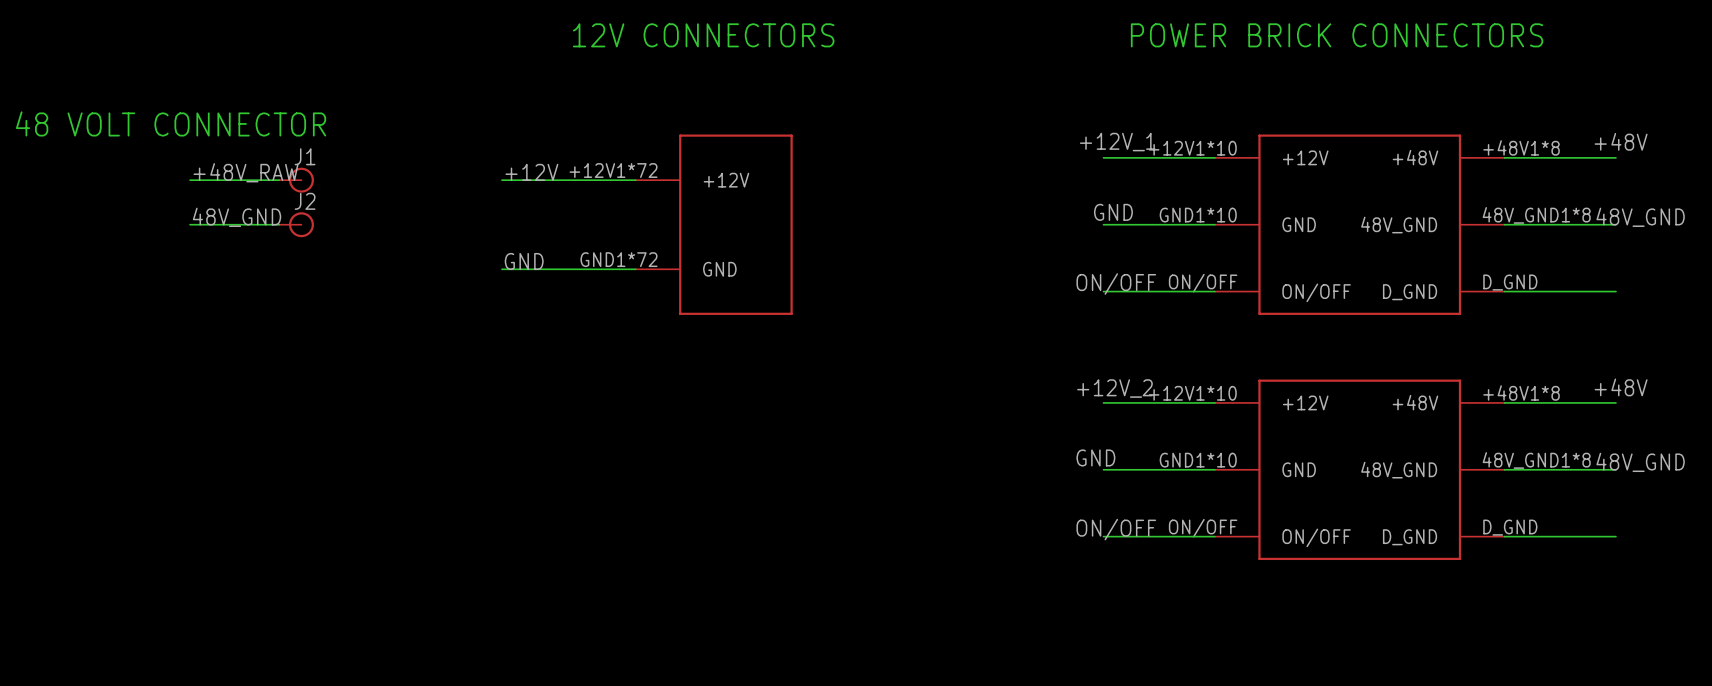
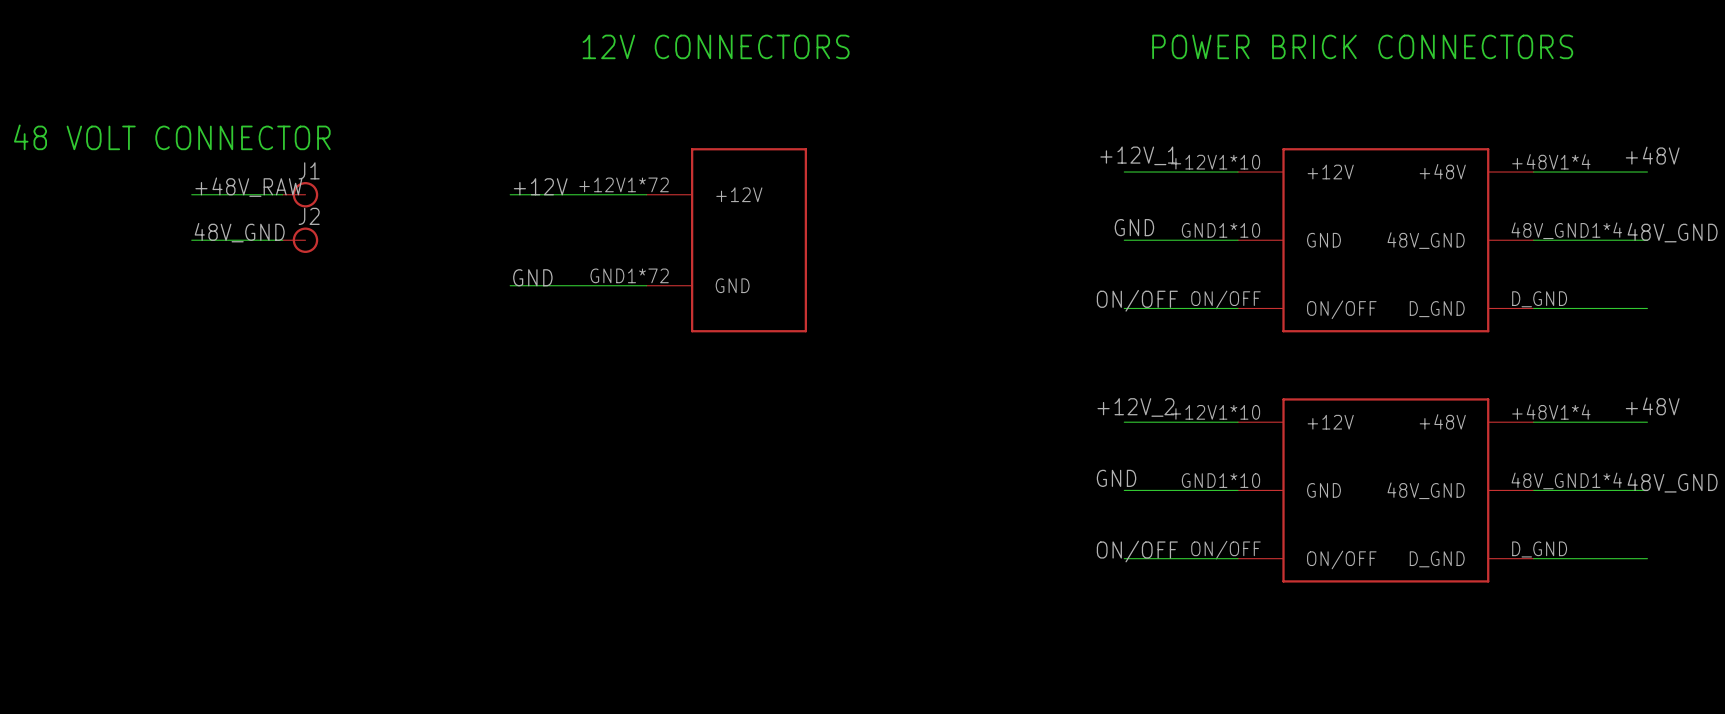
part pin number: +48V1*8 (1521, 147) -> +48V1*4 (1551, 161)
part pin number: 48V_GND1*8 (1536, 215) -> 48V_GND1*4 (1566, 230)
part pin number: +48V1*8 (1521, 392) -> +48V1*4 (1551, 412)
part pin number: 48V_GND1*8 (1536, 460) -> 48V_GND1*4 (1566, 480)

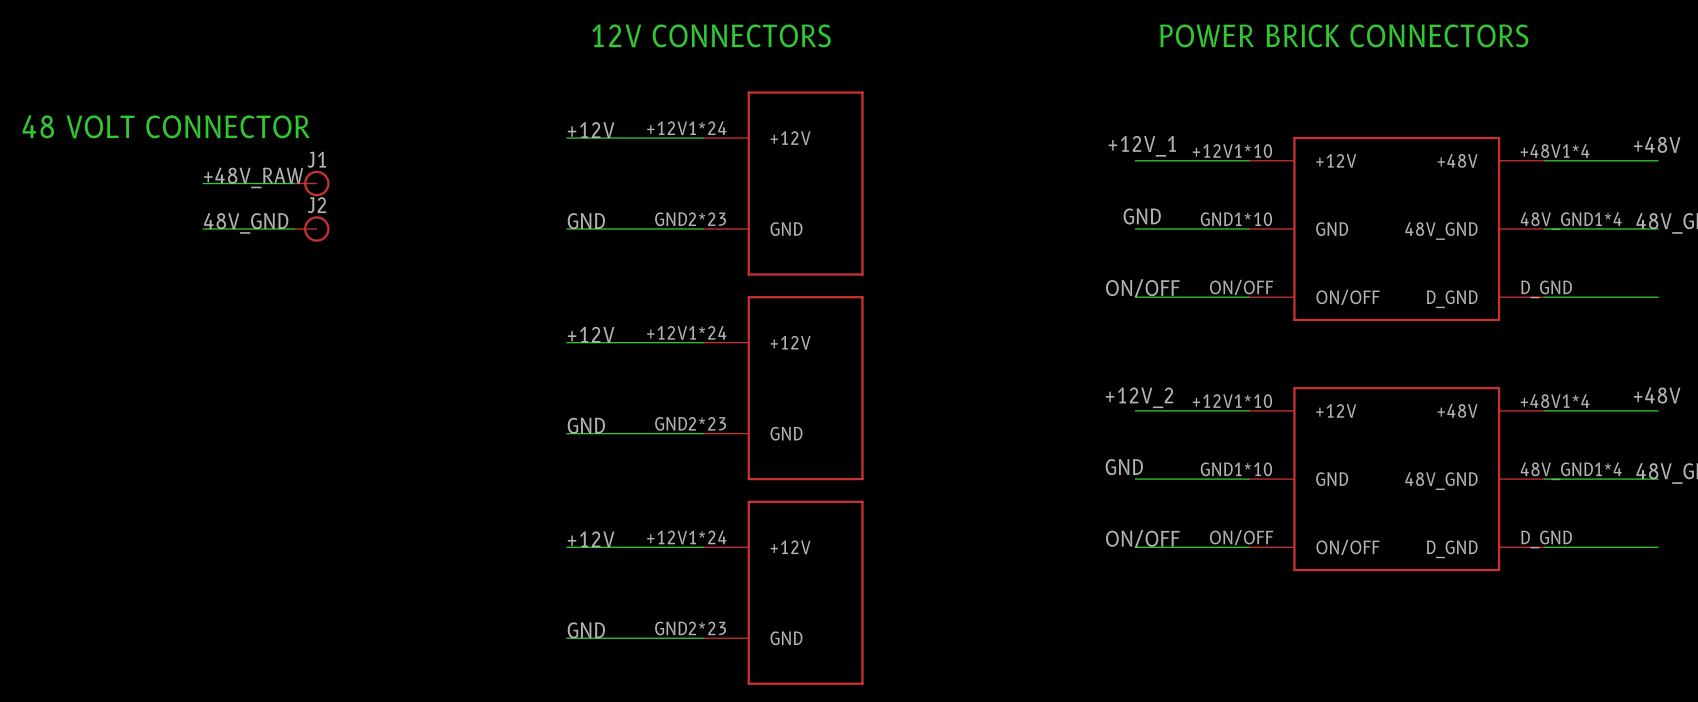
label position: +12V (540, 186) -> +12V (591, 130)
wire: (510, 194) (646, 194) -> (566, 138) (703, 138)
part: none -> (783, 183)
part: (726, 240) -> none
label position: GND (532, 277) -> GND (586, 221)
wire: (510, 285) (646, 285) -> (566, 229) (703, 229)
label: none -> +12V (591, 334)
wire: none -> (566, 342) (703, 342)
part: none -> (783, 388)
label: none -> GND (586, 425)
wire: none -> (566, 433) (703, 433)
label: none -> +12V (591, 539)
wire: none -> (566, 547) (703, 547)
part: none -> (783, 592)
label: none -> GND (586, 630)
wire: none -> (566, 638) (703, 638)

